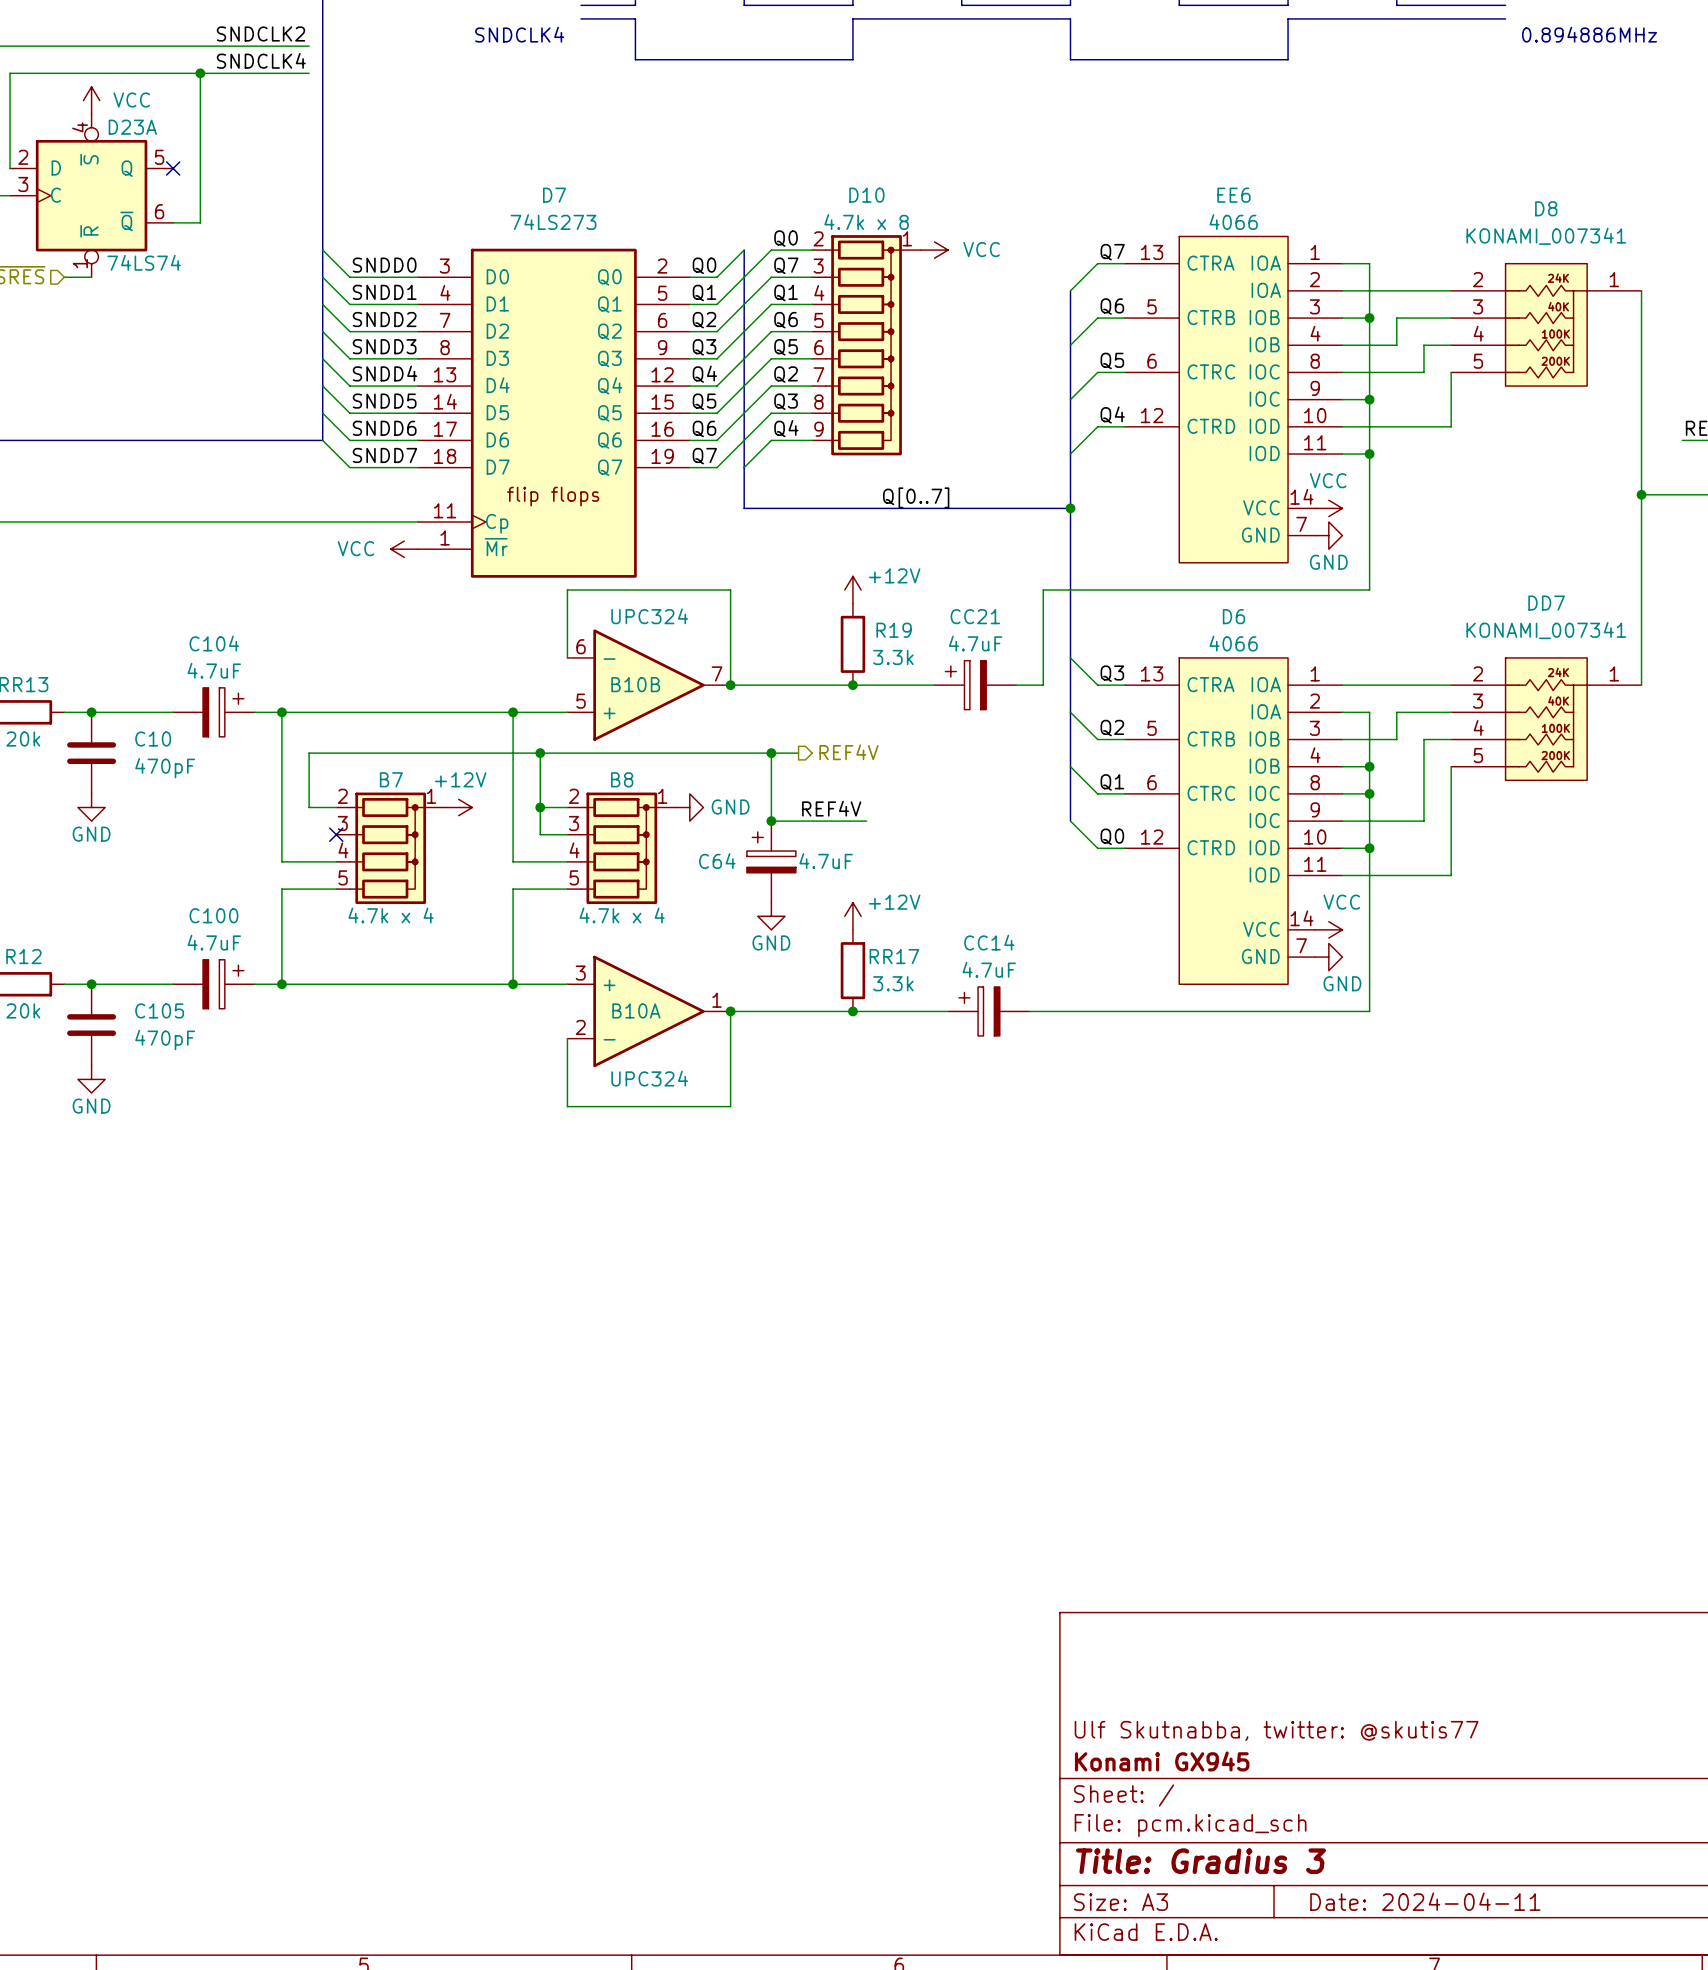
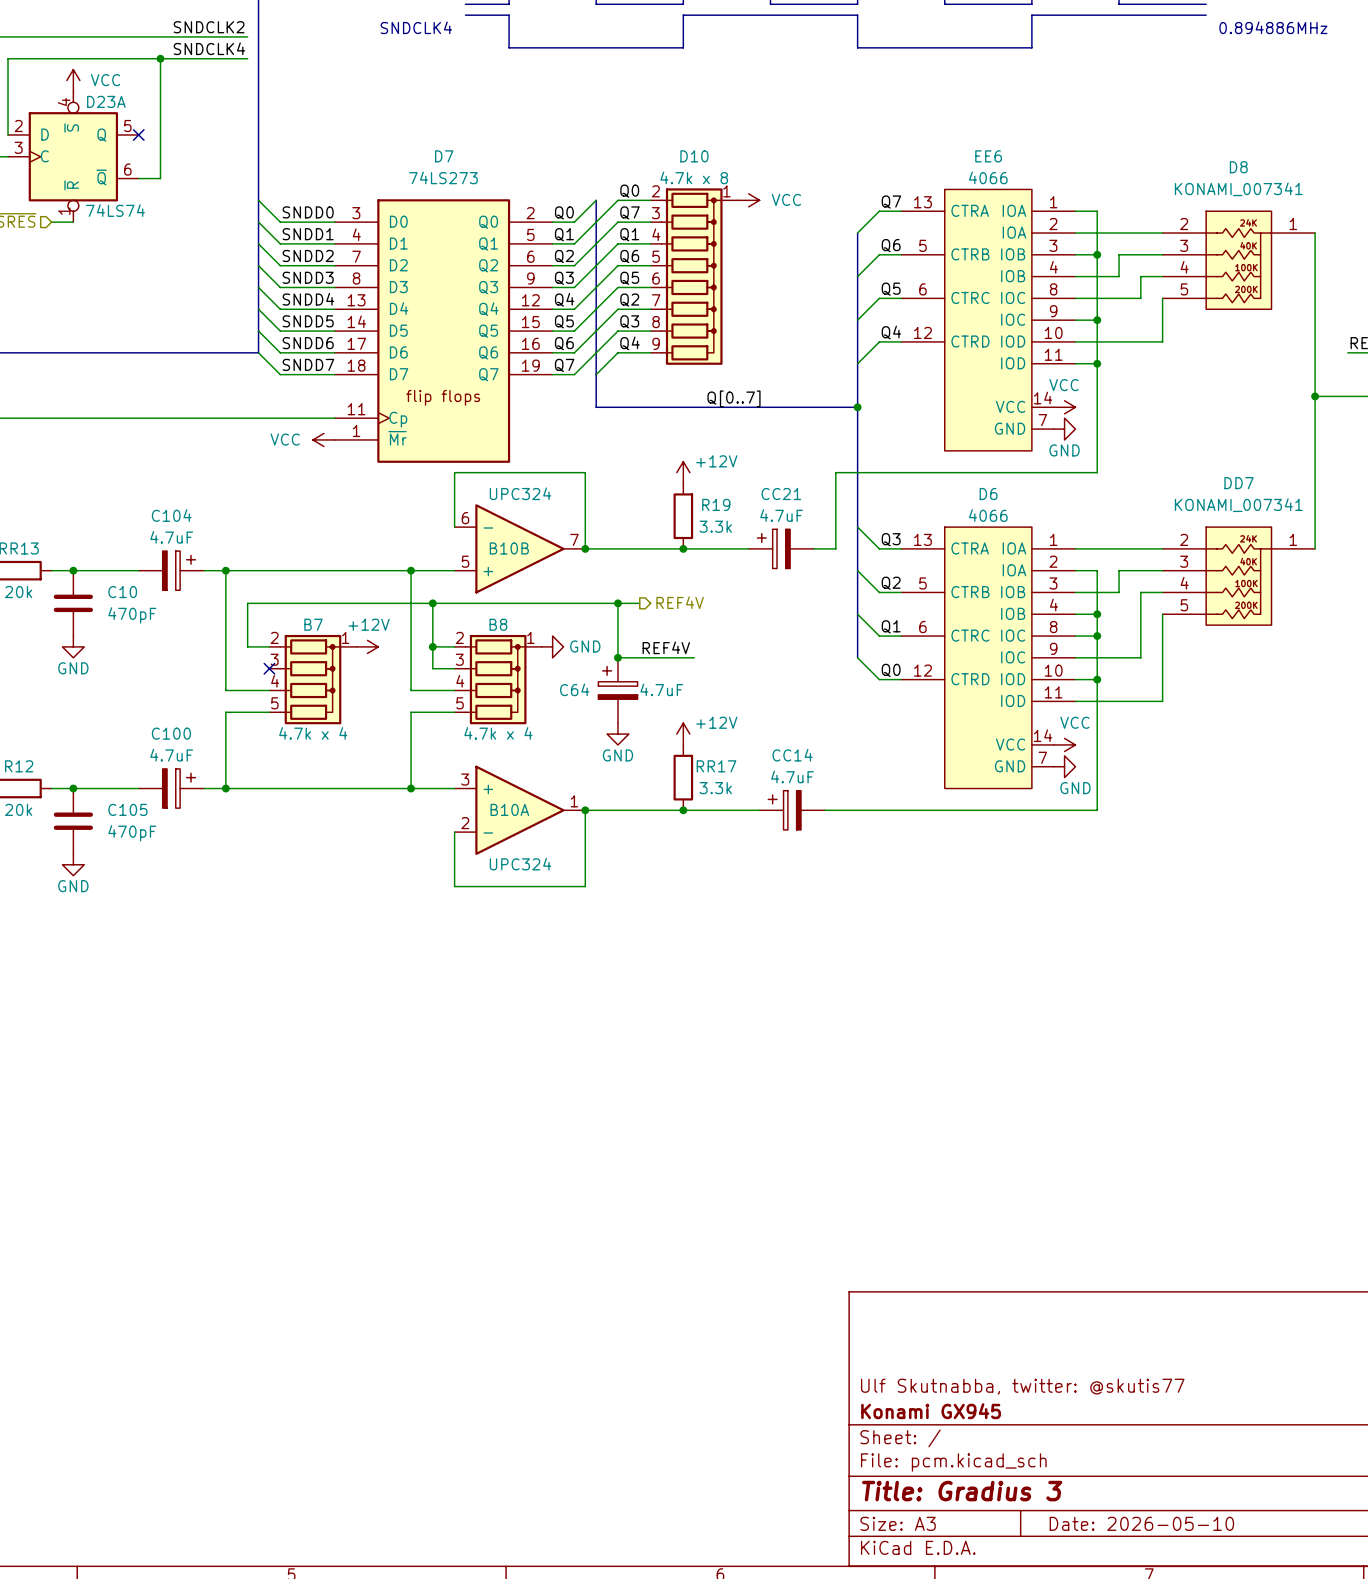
title block: Date: 2024-04-11 (1425, 1901) -> Date: 2026-05-10 (1141, 1523)

